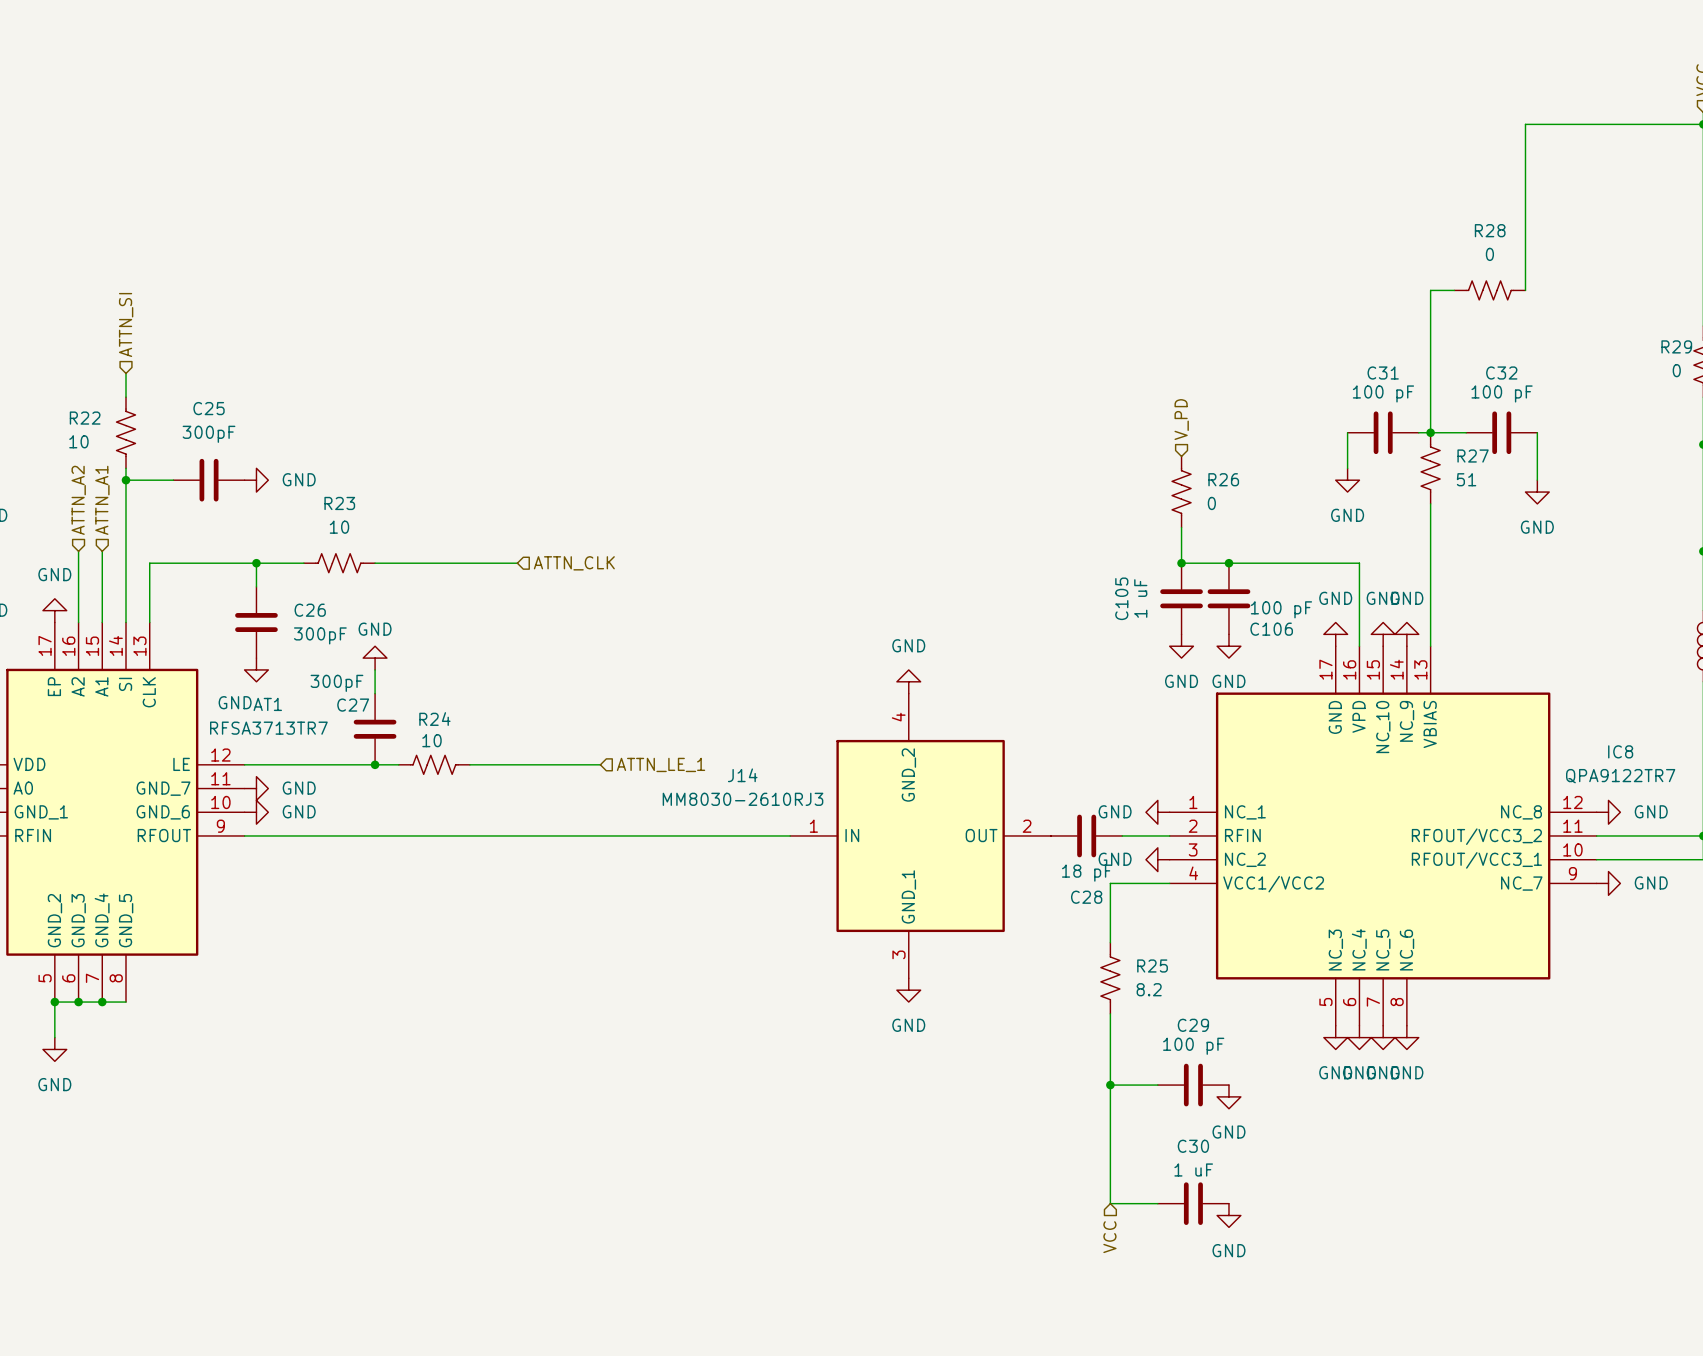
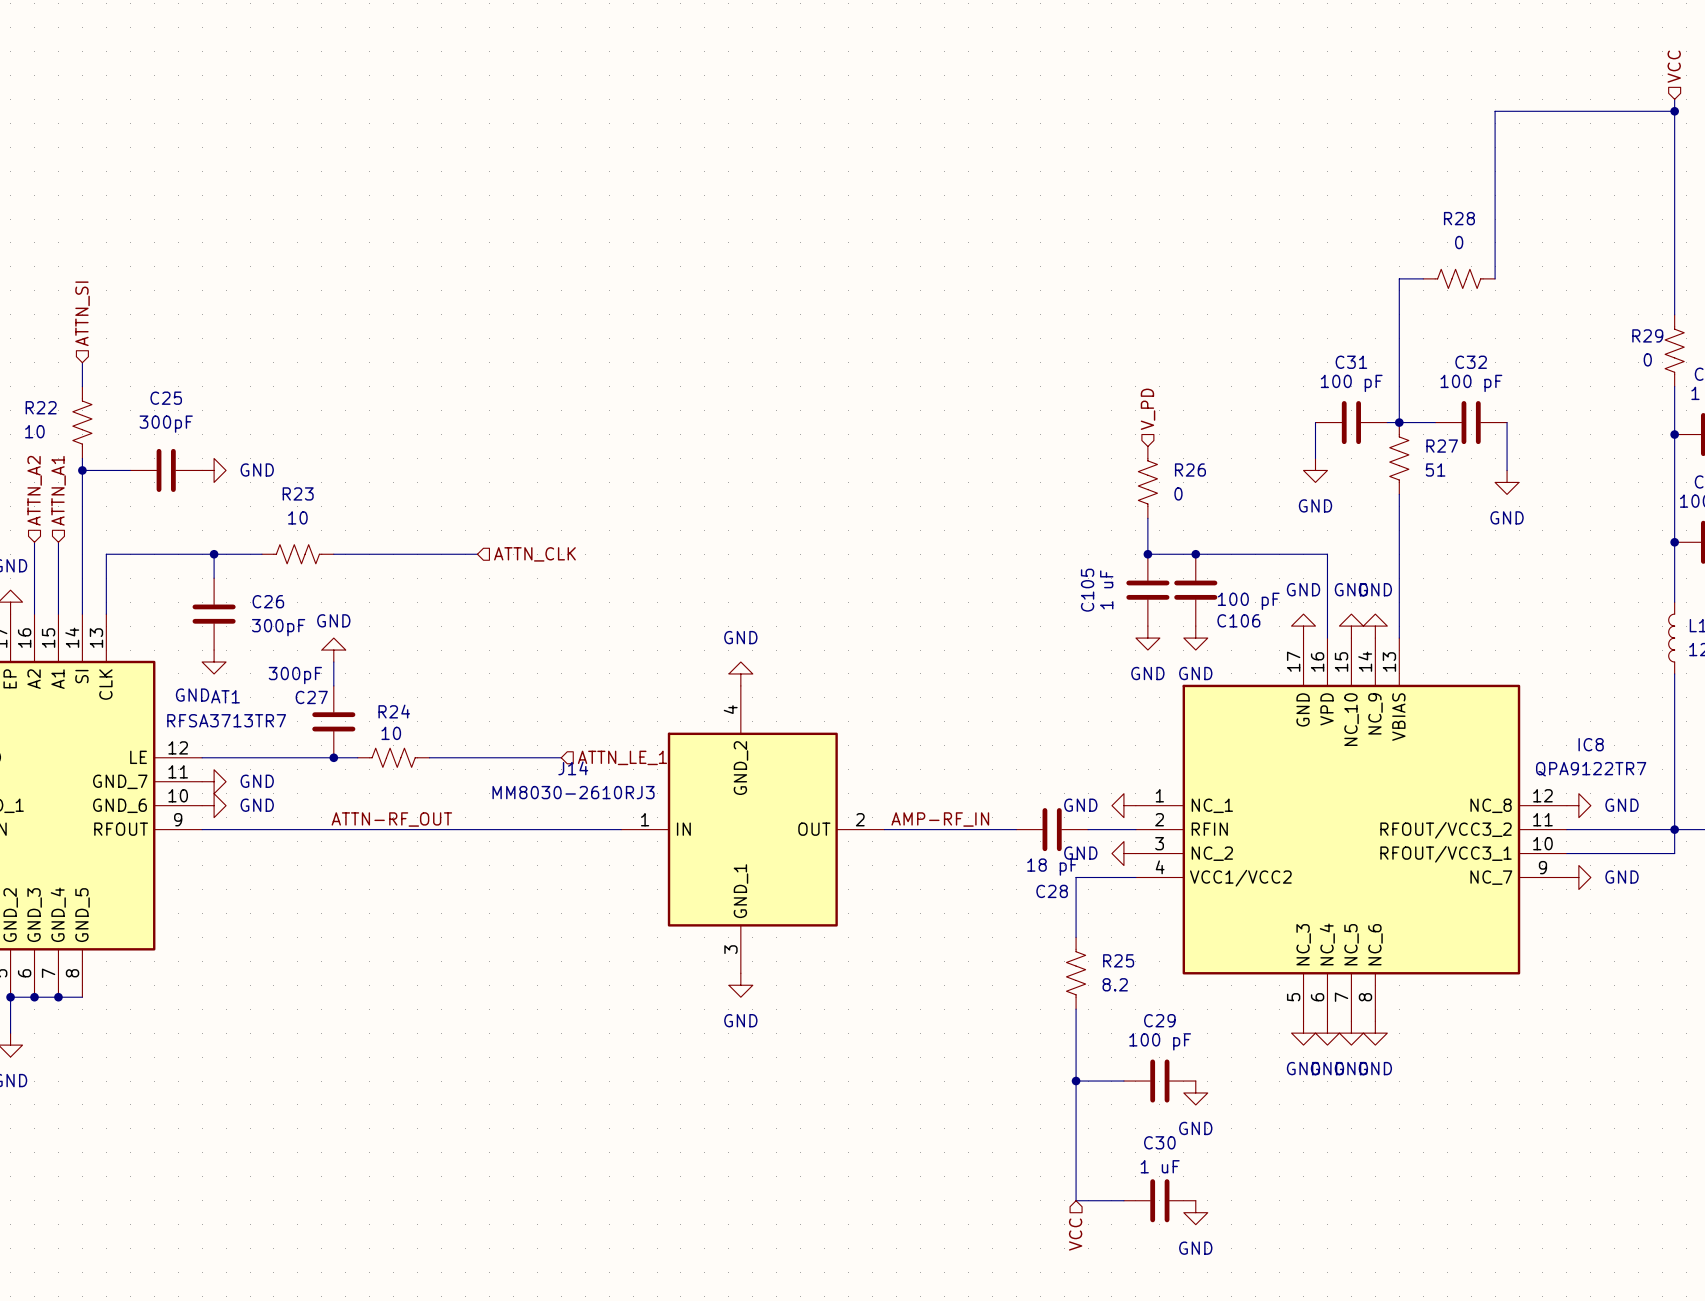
power symbol position: GND (908, 681) -> GND (740, 673)
label: none -> ATTN-RF_OUT (391, 819)
label: none -> AMP-RF_IN (940, 819)
J14 position: (920, 835) -> (752, 829)
power symbol position: GND (908, 990) -> GND (740, 985)

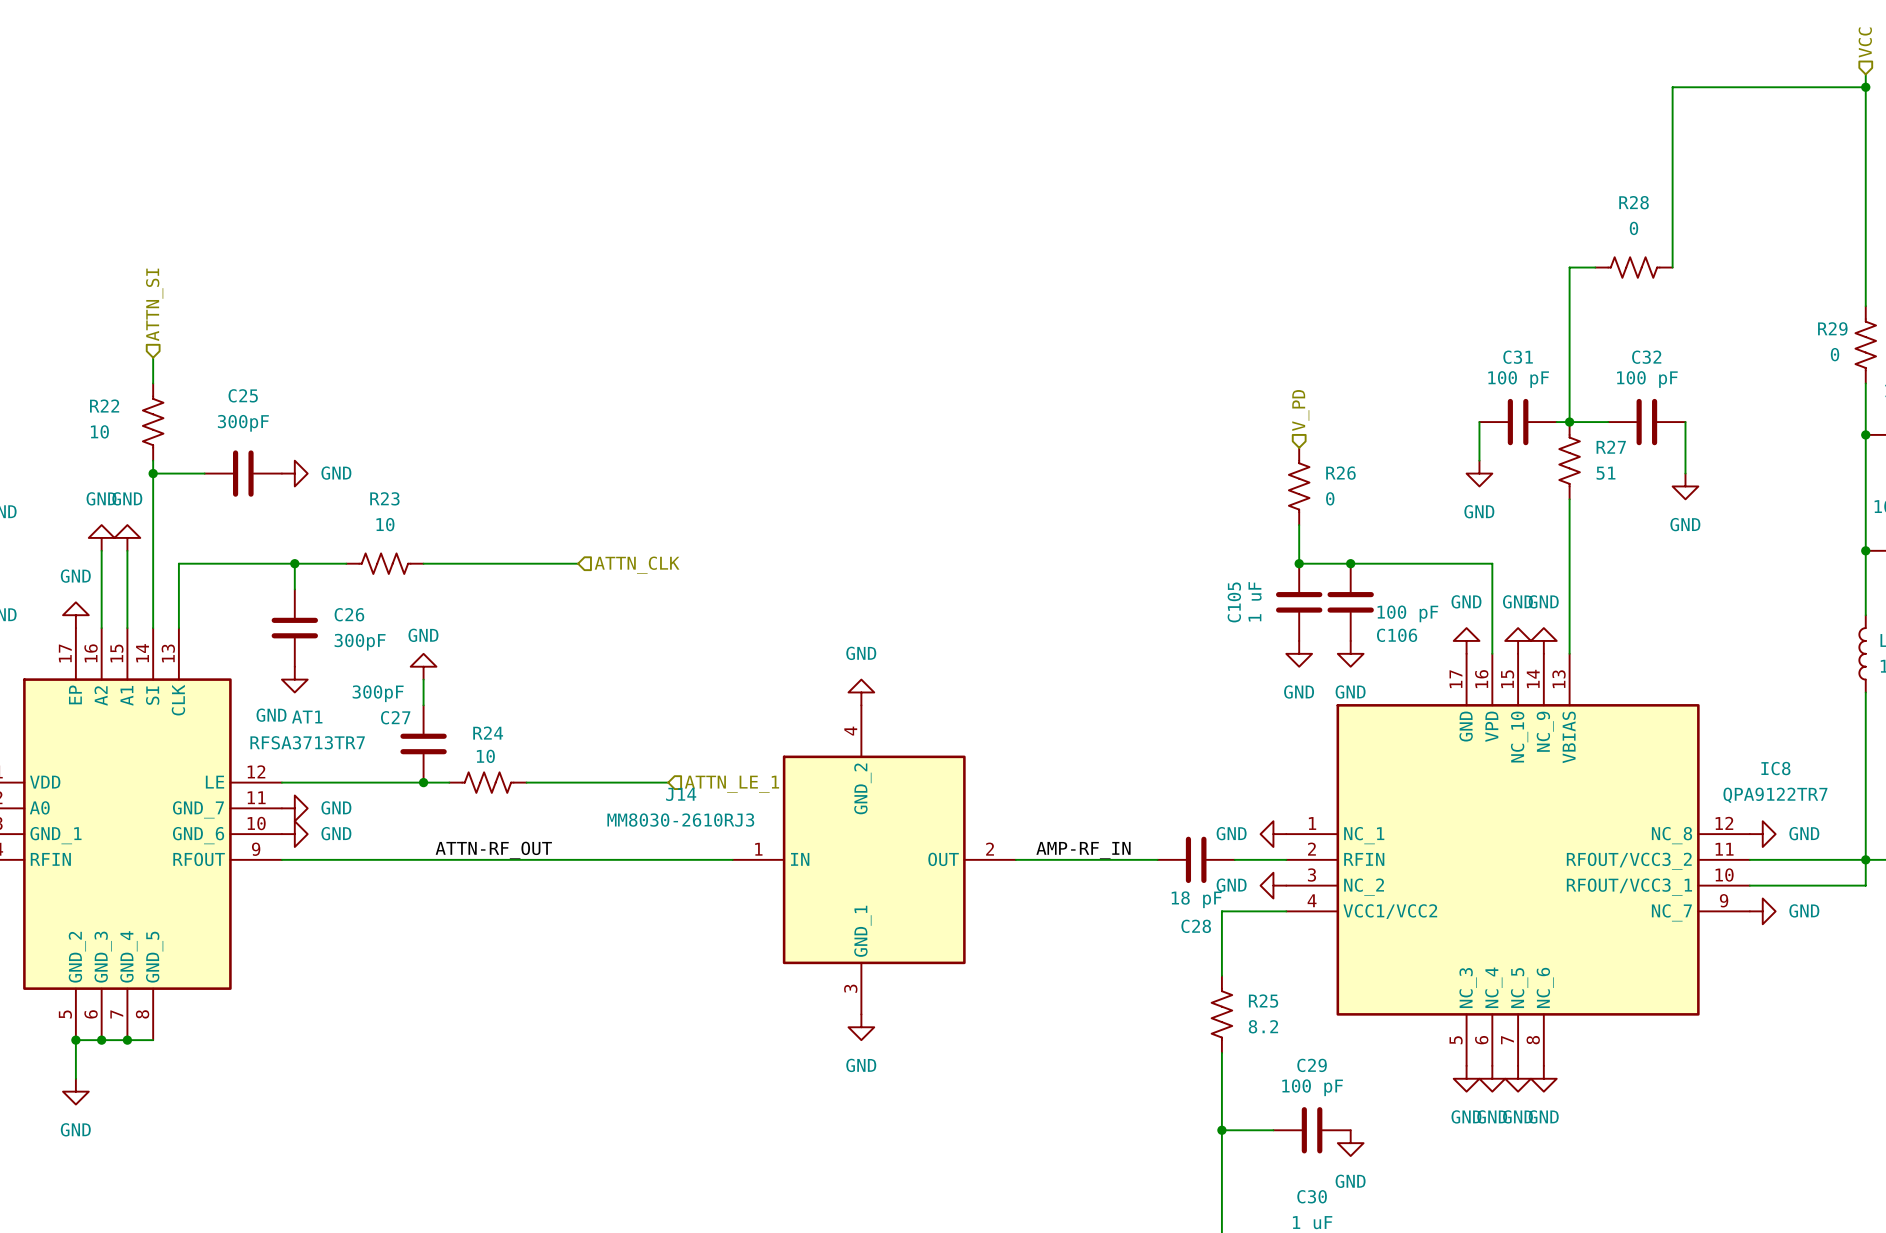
hierarchical label: ATTN_A2 (34, 490) -> none
hierarchical label: ATTN_A1 (58, 490) -> none
power symbol: none -> GND (101, 537)
power symbol: none -> GND (127, 537)

